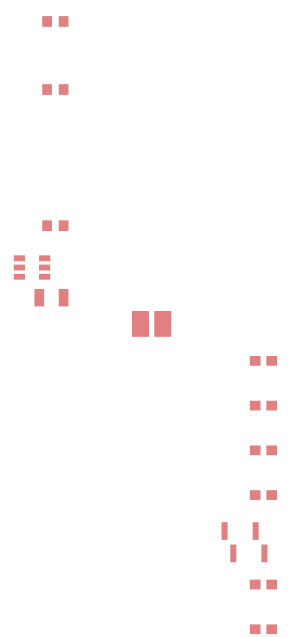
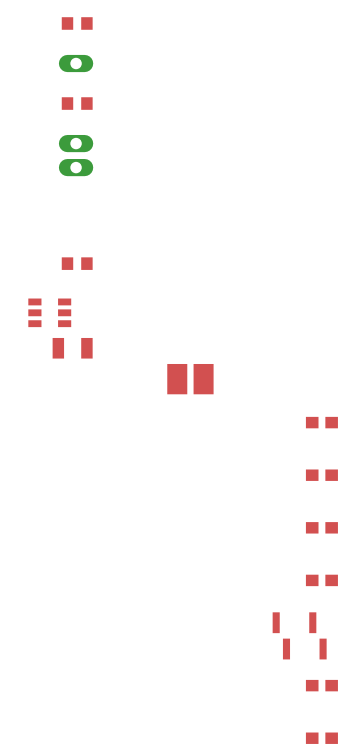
part: none -> (76, 63)
part: none -> (76, 143)
part: none -> (76, 167)

